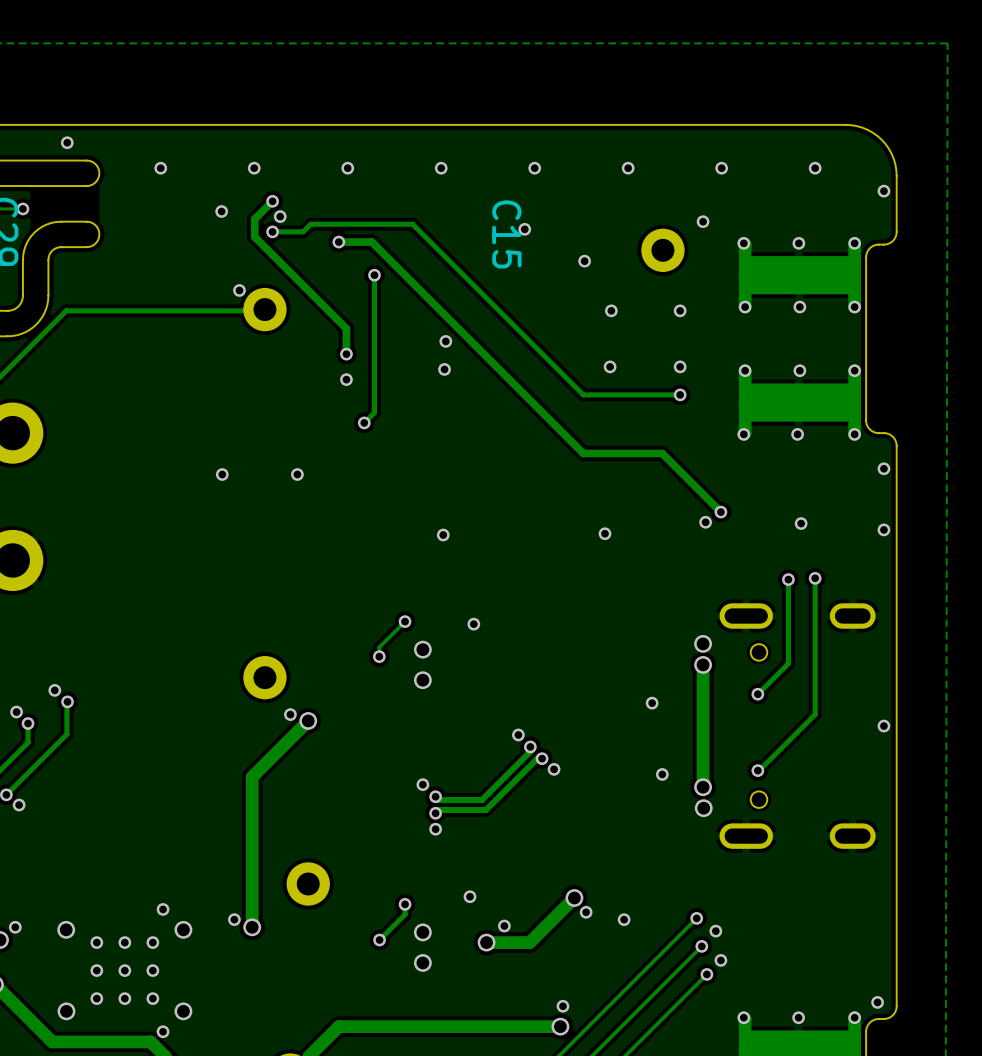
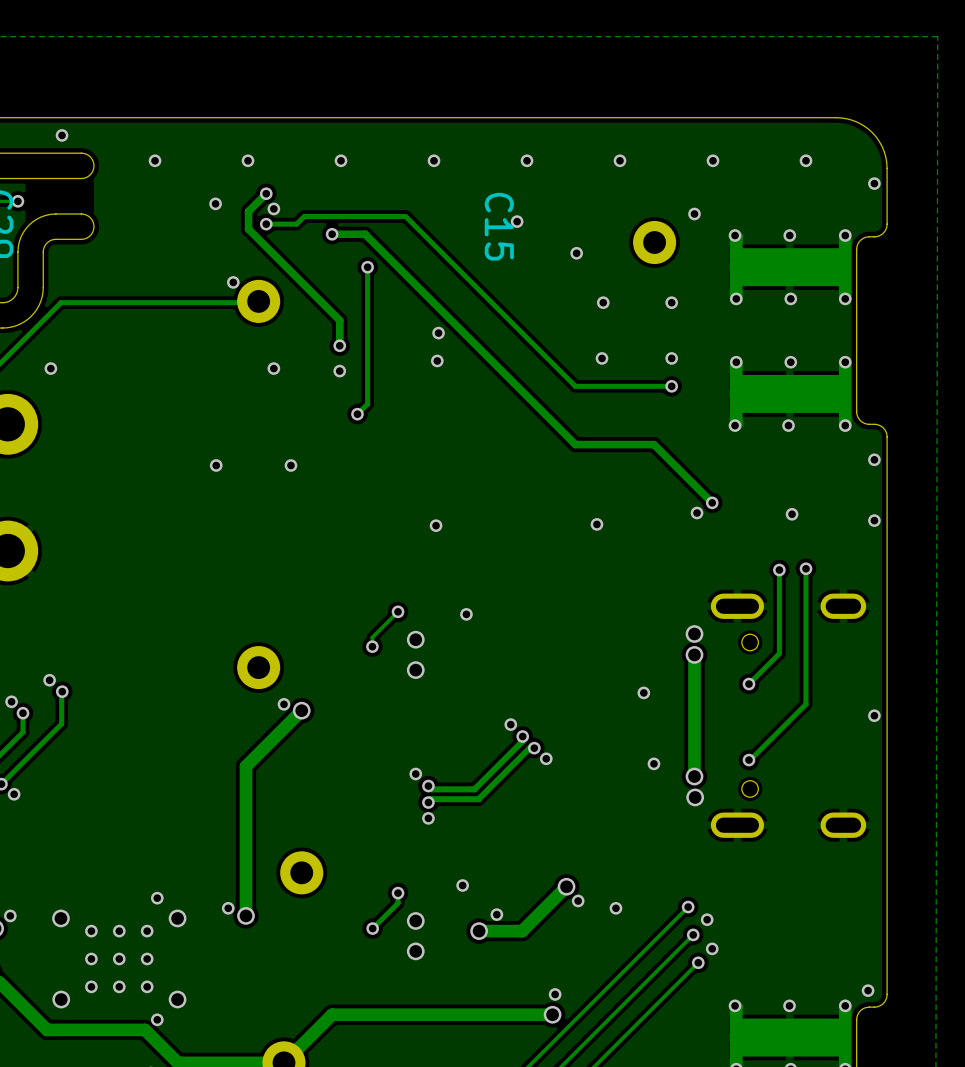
via: none -> (50, 368)
via: none -> (273, 368)

